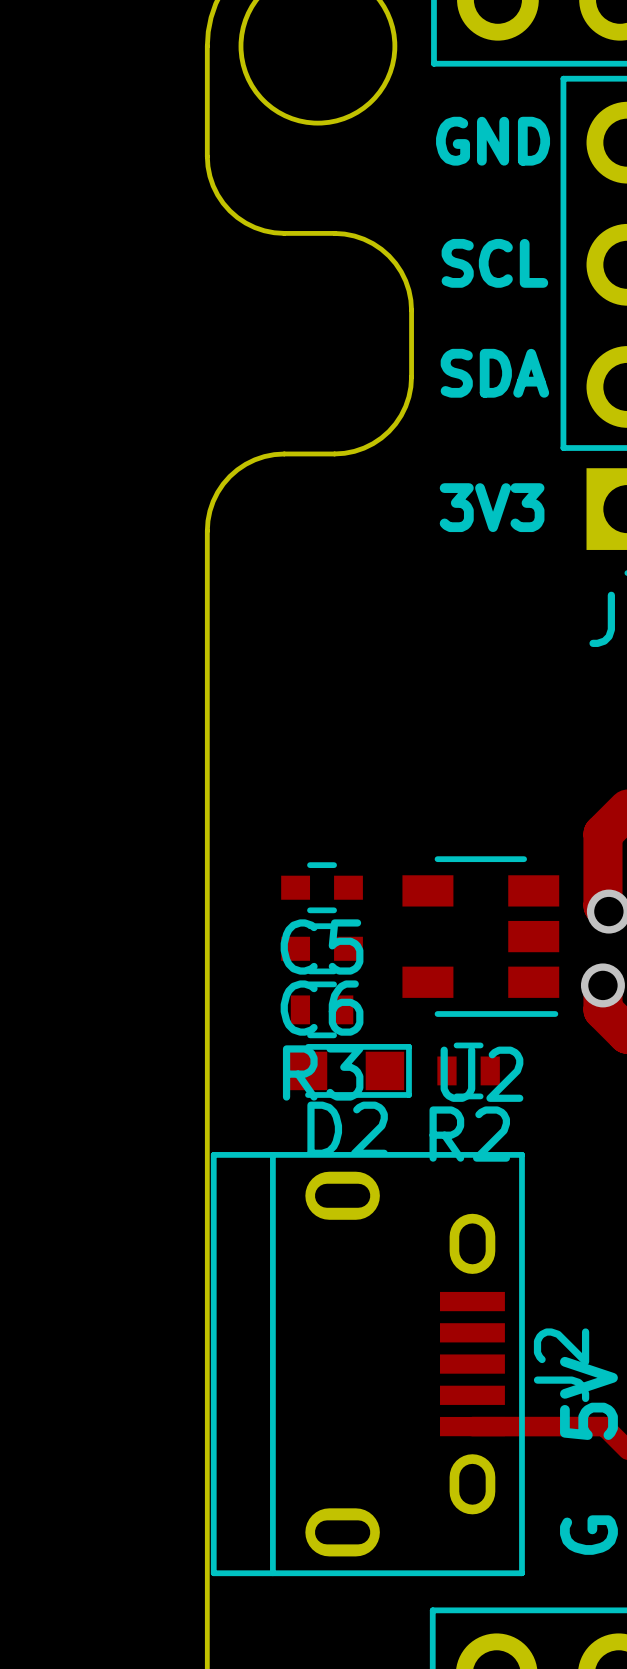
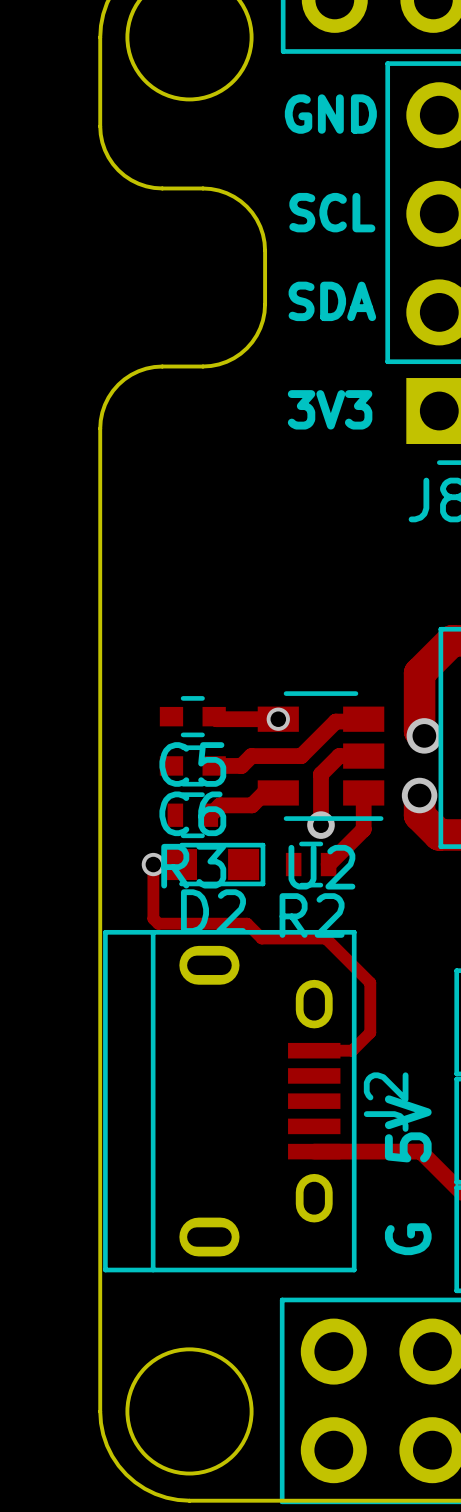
track: none -> (214, 716) (216, 719) (278, 719)
via: none -> (278, 719)
track: none -> (362, 719) (360, 721) (335, 721) (301, 756) (251, 756) (241, 765) (214, 765)
track: none -> (363, 756) (339, 756) (320, 774) (320, 825)
track: none -> (278, 792) (264, 792) (251, 805) (220, 805) (210, 815)
track: none -> (363, 792) (363, 829) (328, 864)
via: none -> (320, 825)
via: none -> (153, 864)
track: none -> (187, 864) (153, 864) (153, 918) (158, 923) (247, 923) (261, 938) (325, 938) (370, 982) (370, 1032) (352, 1050) (314, 1050)

